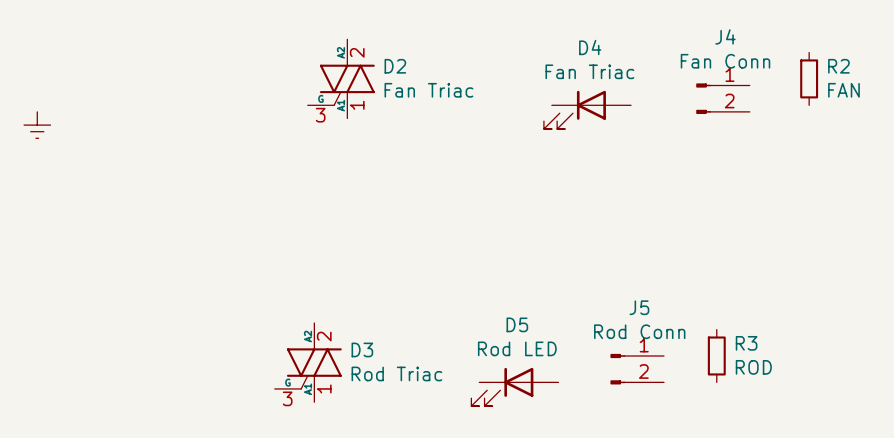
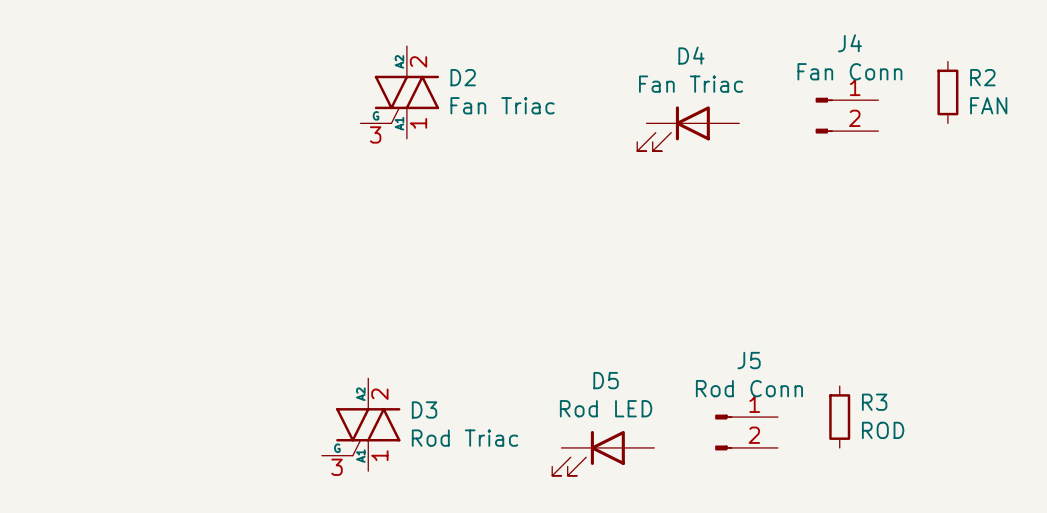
power symbol: (37, 125) -> none

